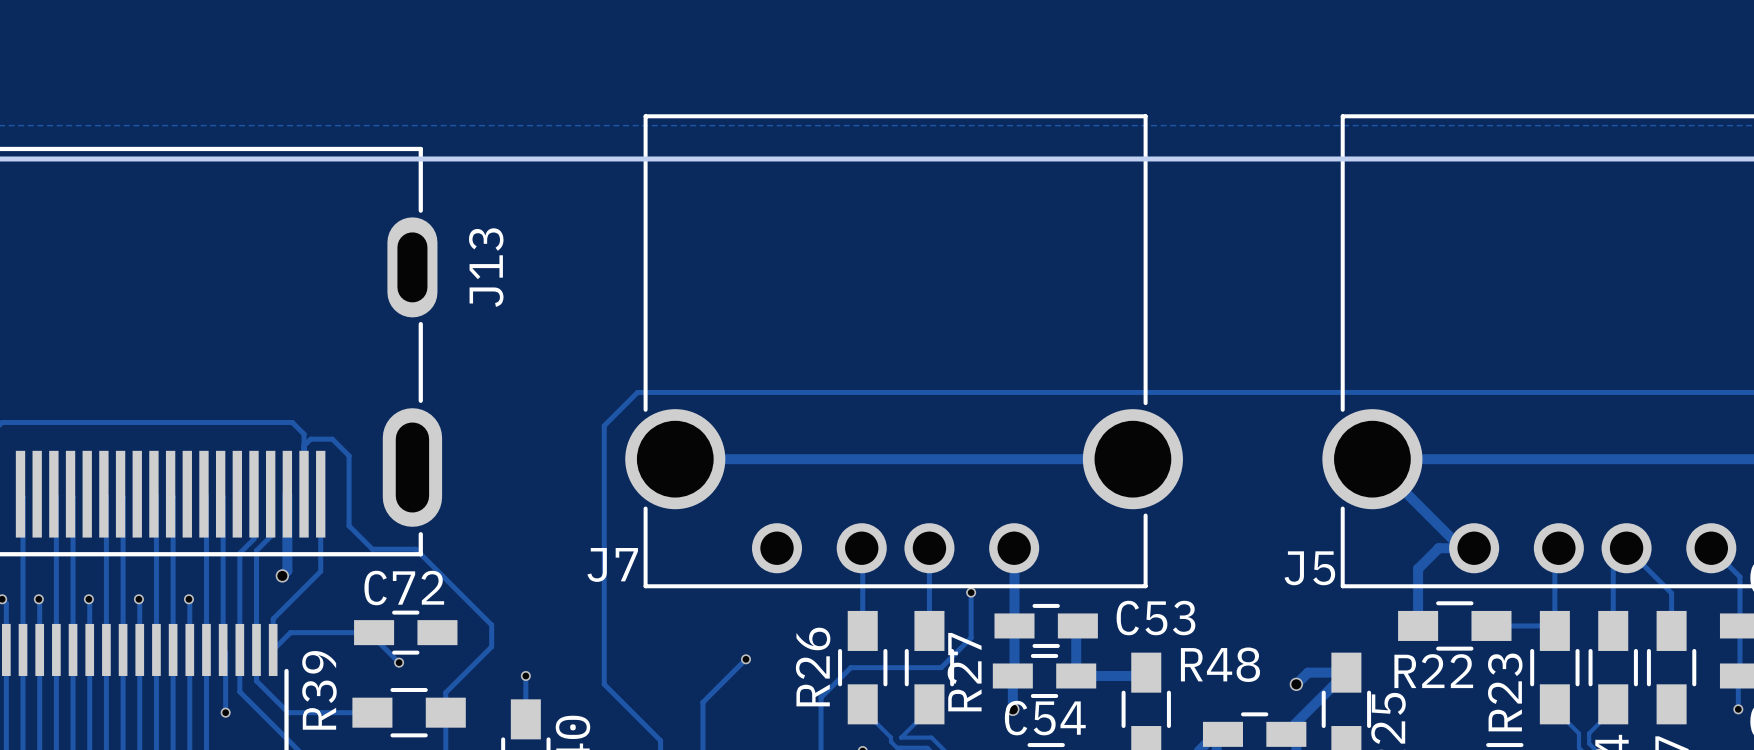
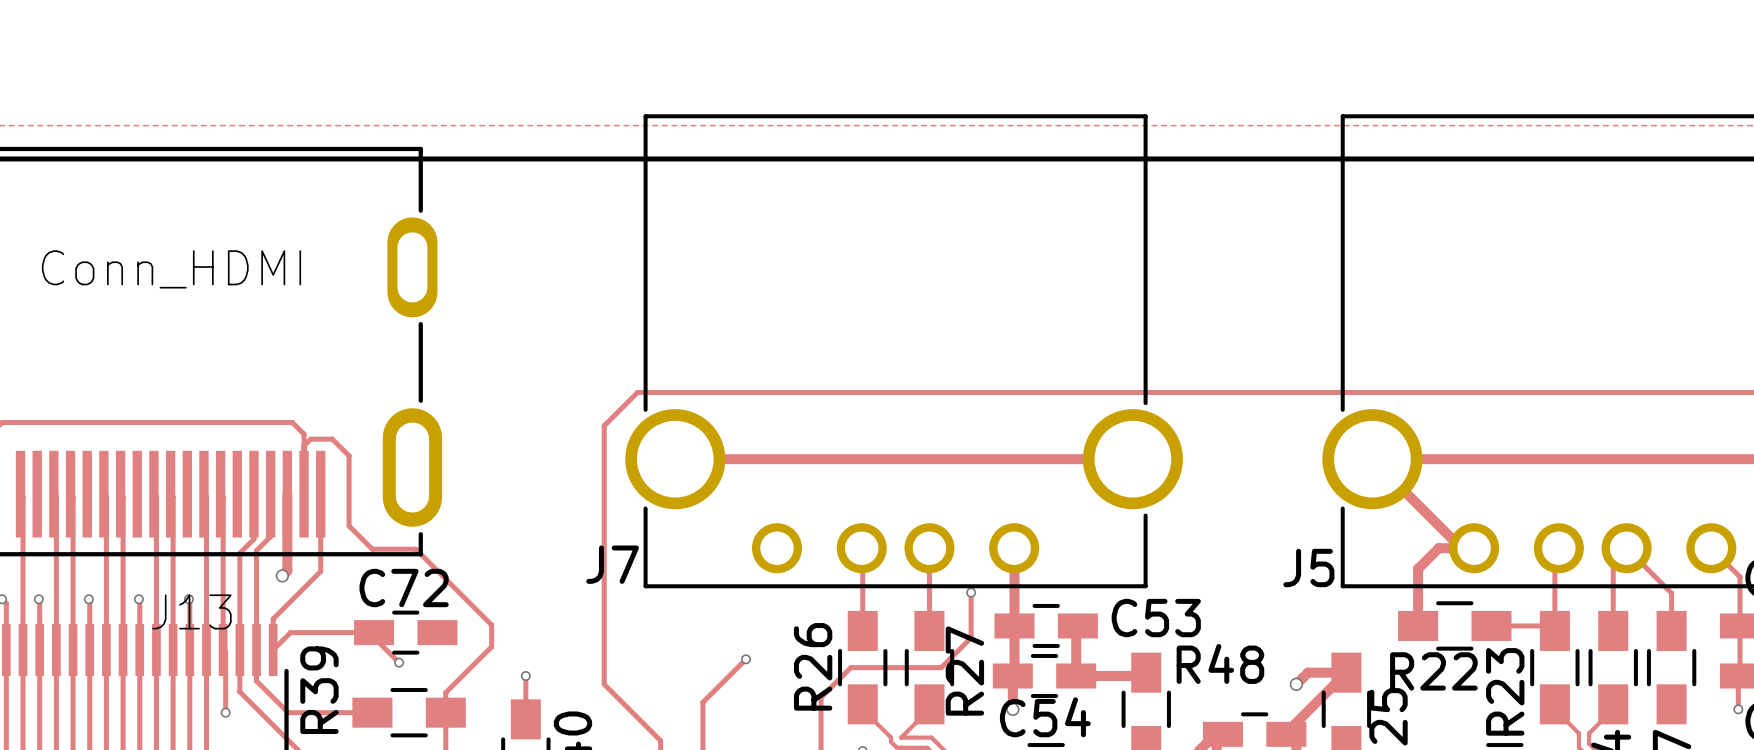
J13 name rotation: 0° (486, 267) -> 90° clockwise (191, 611)
J13 name position: J13 (486, 267) -> J13 (191, 611)
J13 value: none -> Conn_HDMI (171, 269)

